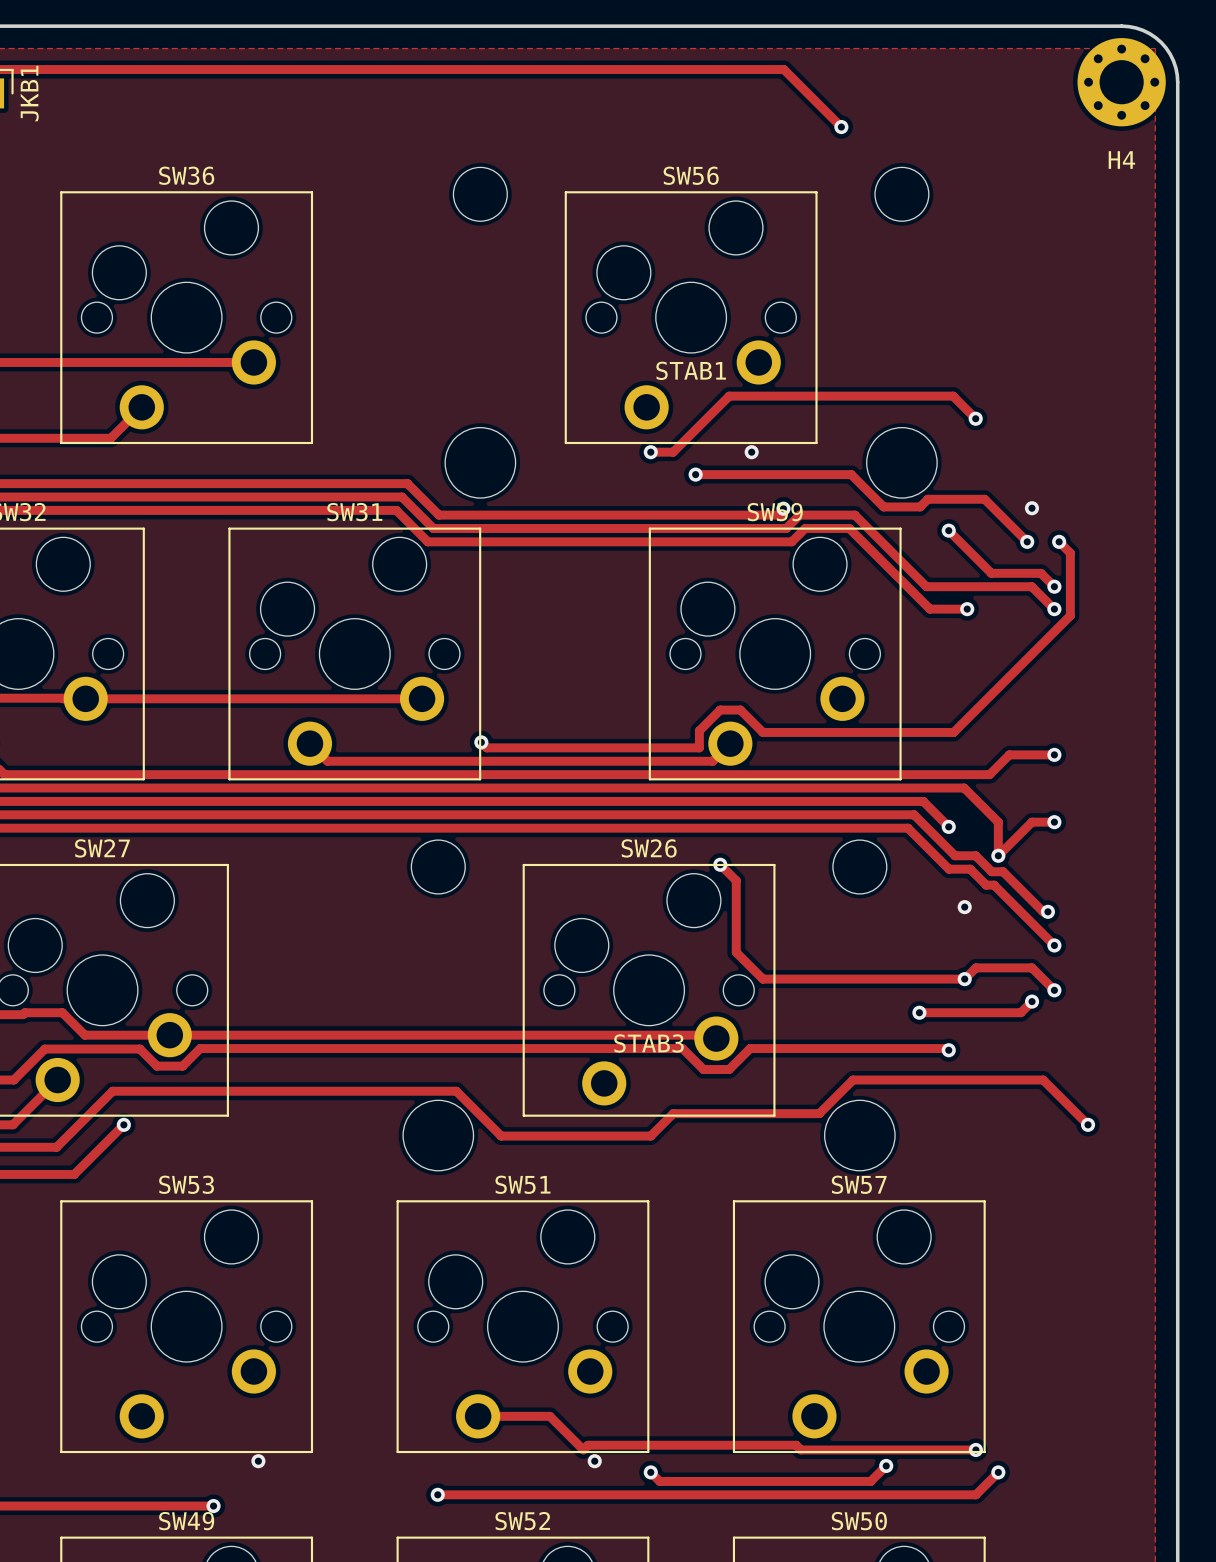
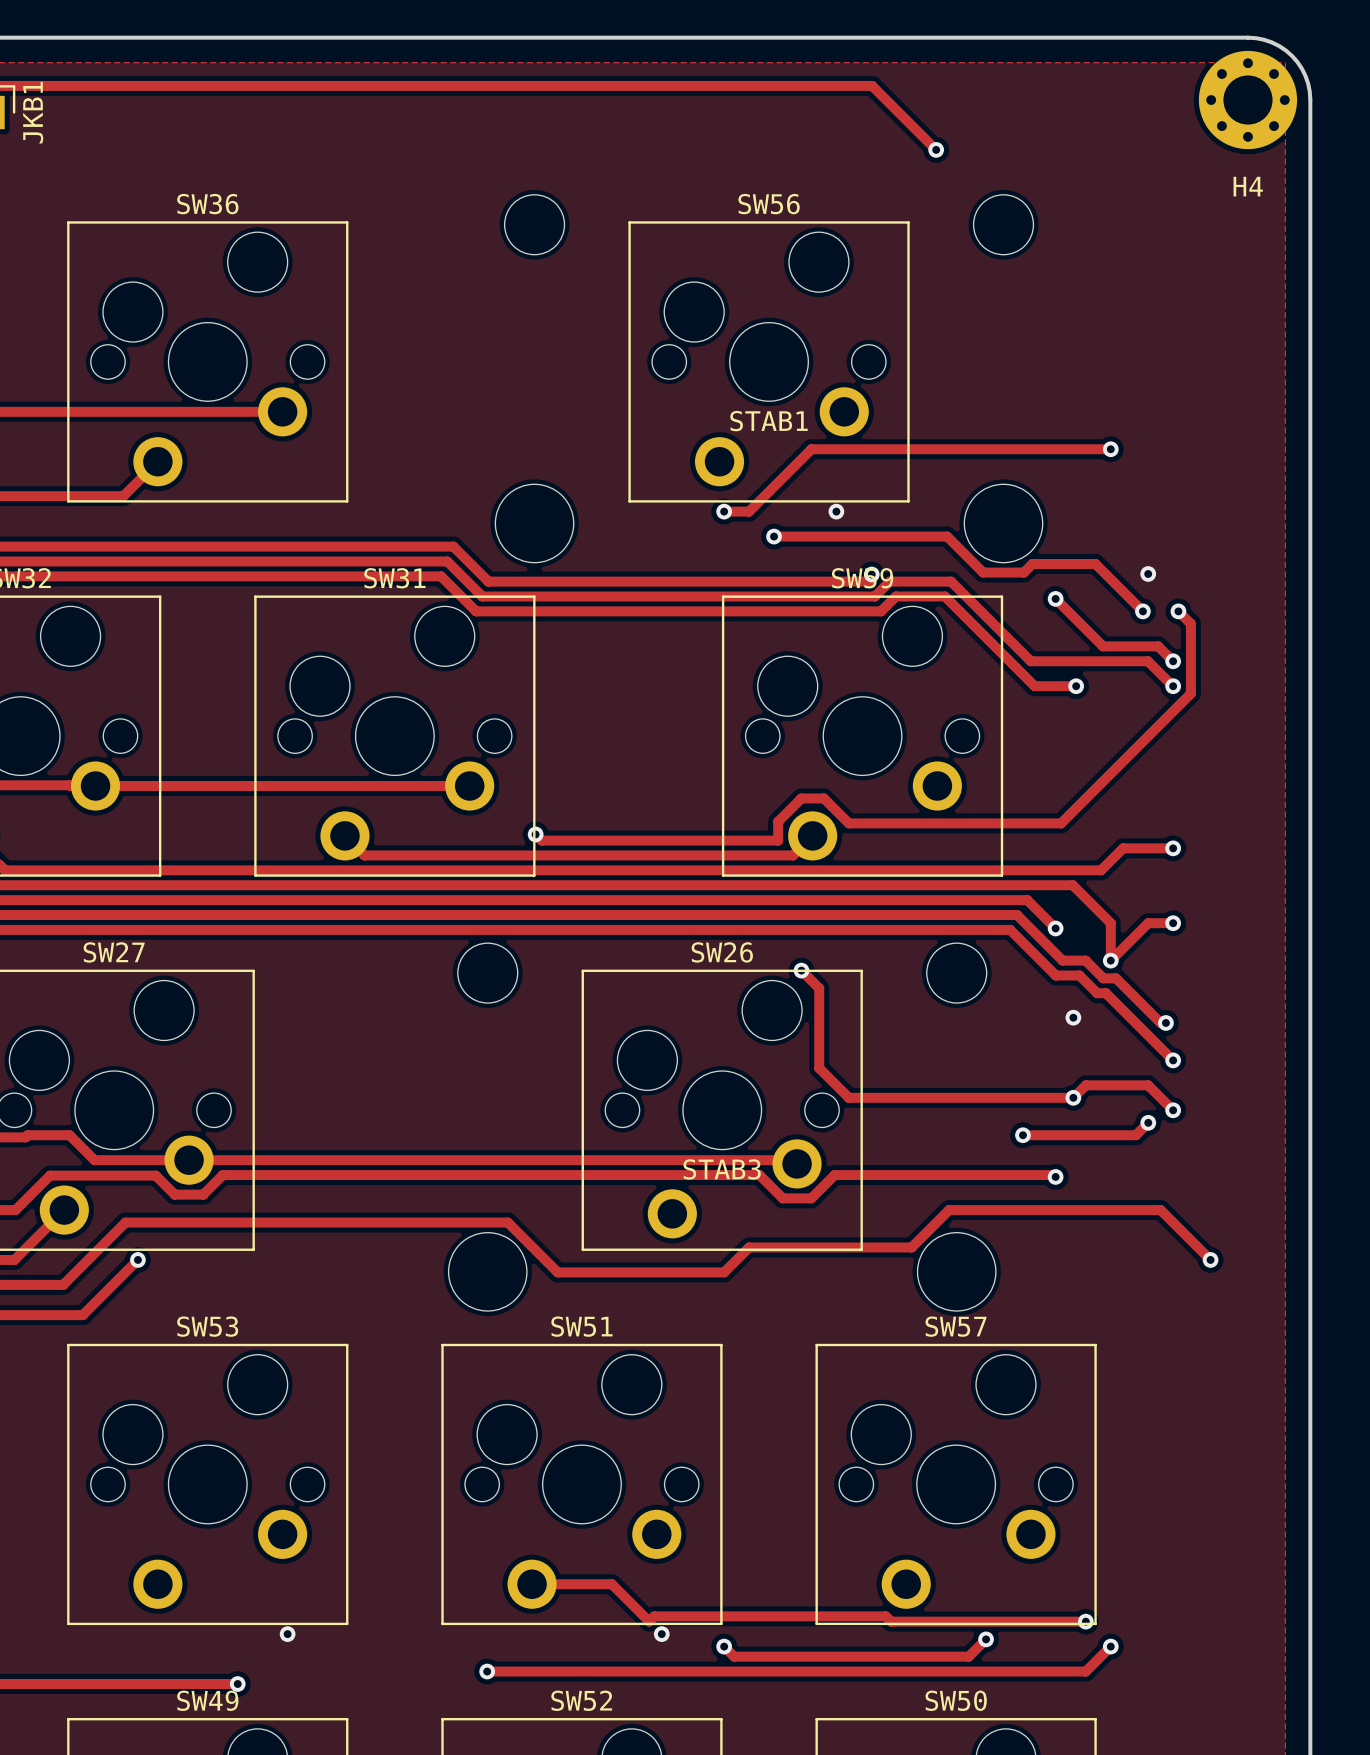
track: (953, 396) (975, 418) -> (1060, 449) (1110, 449)
via position: (975, 418) -> (1110, 449)

